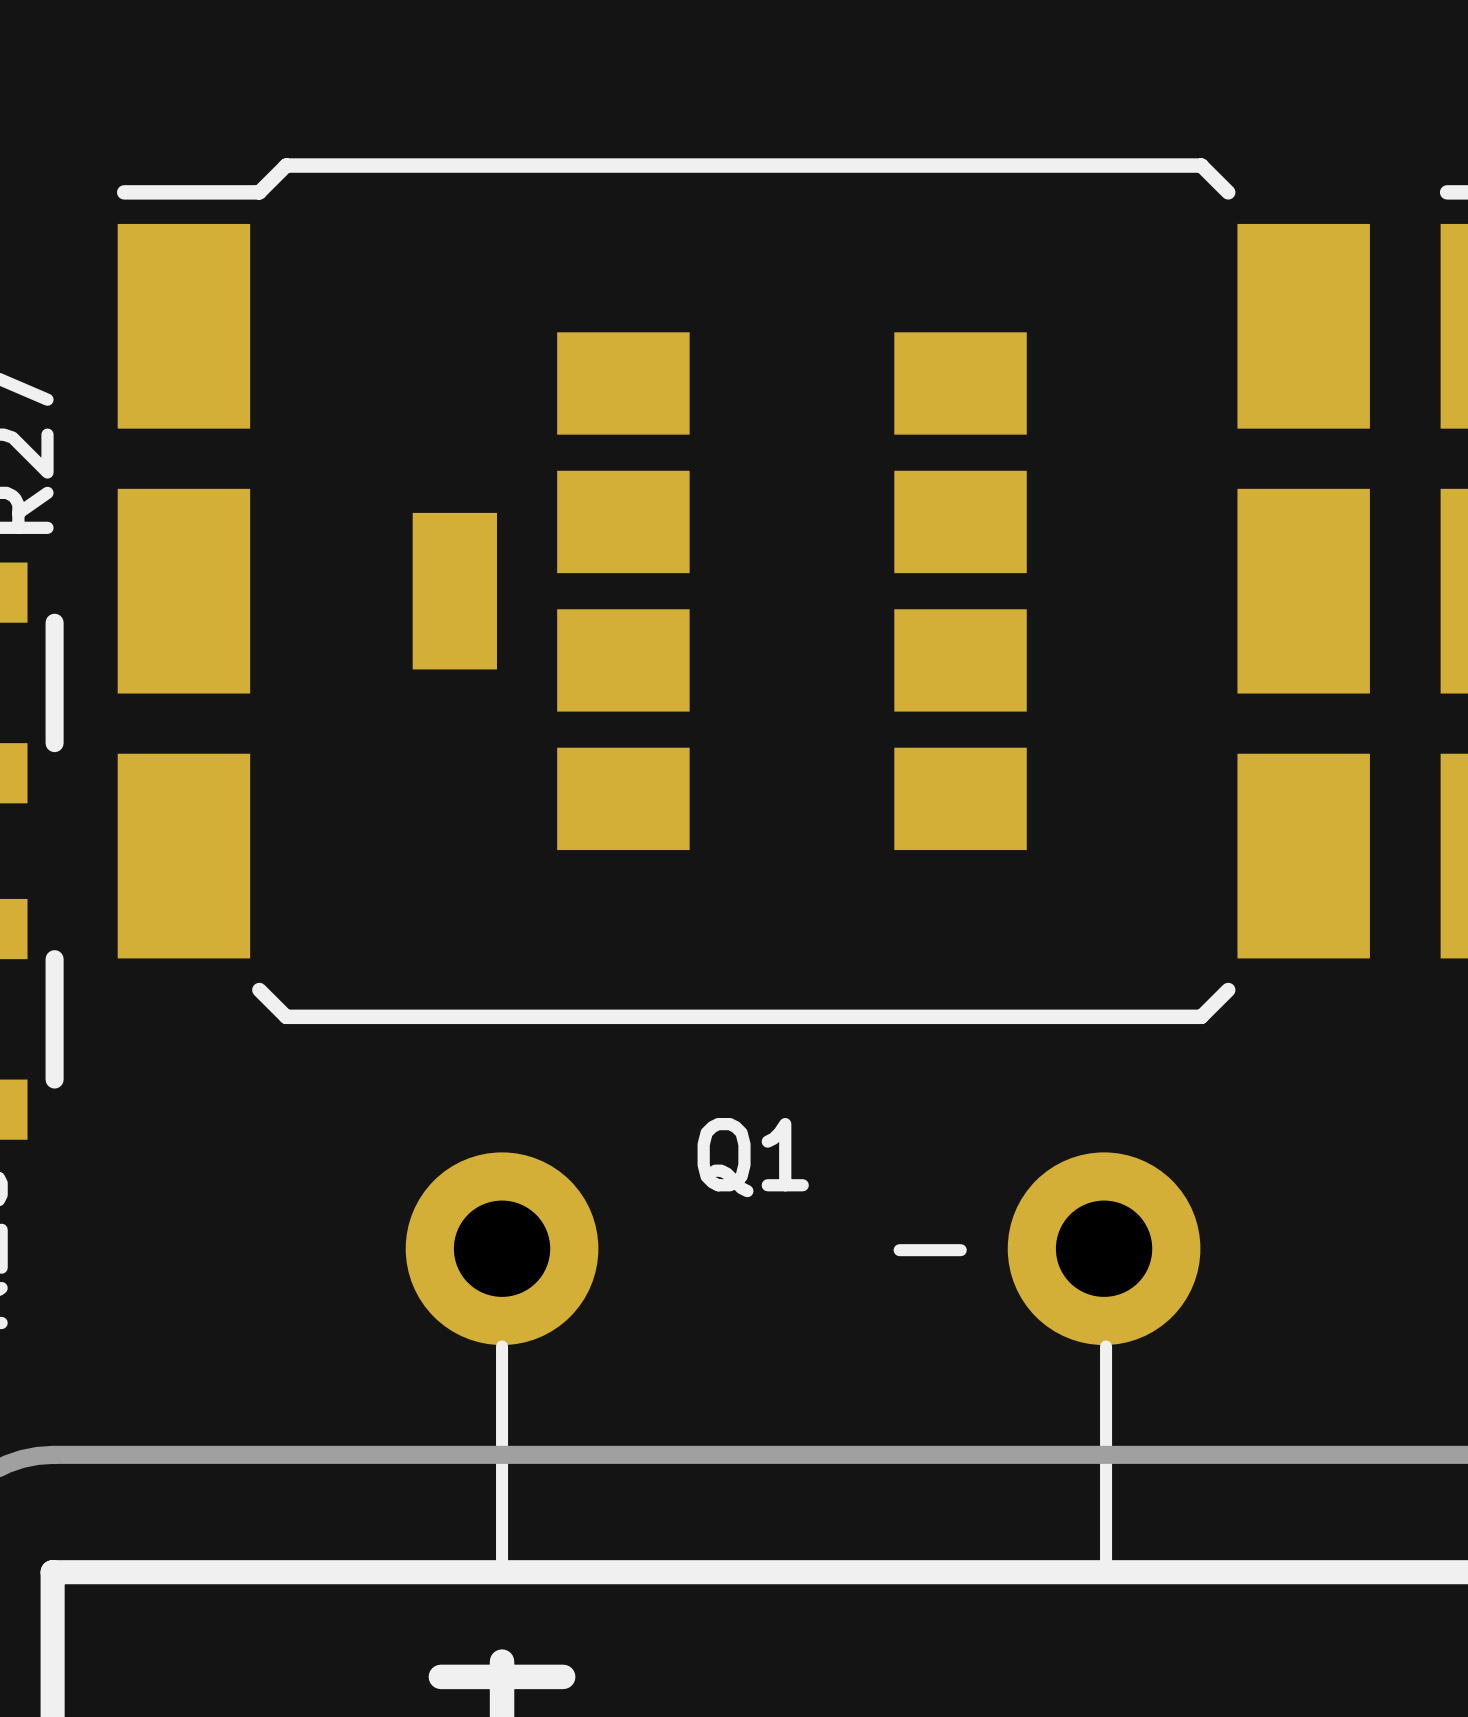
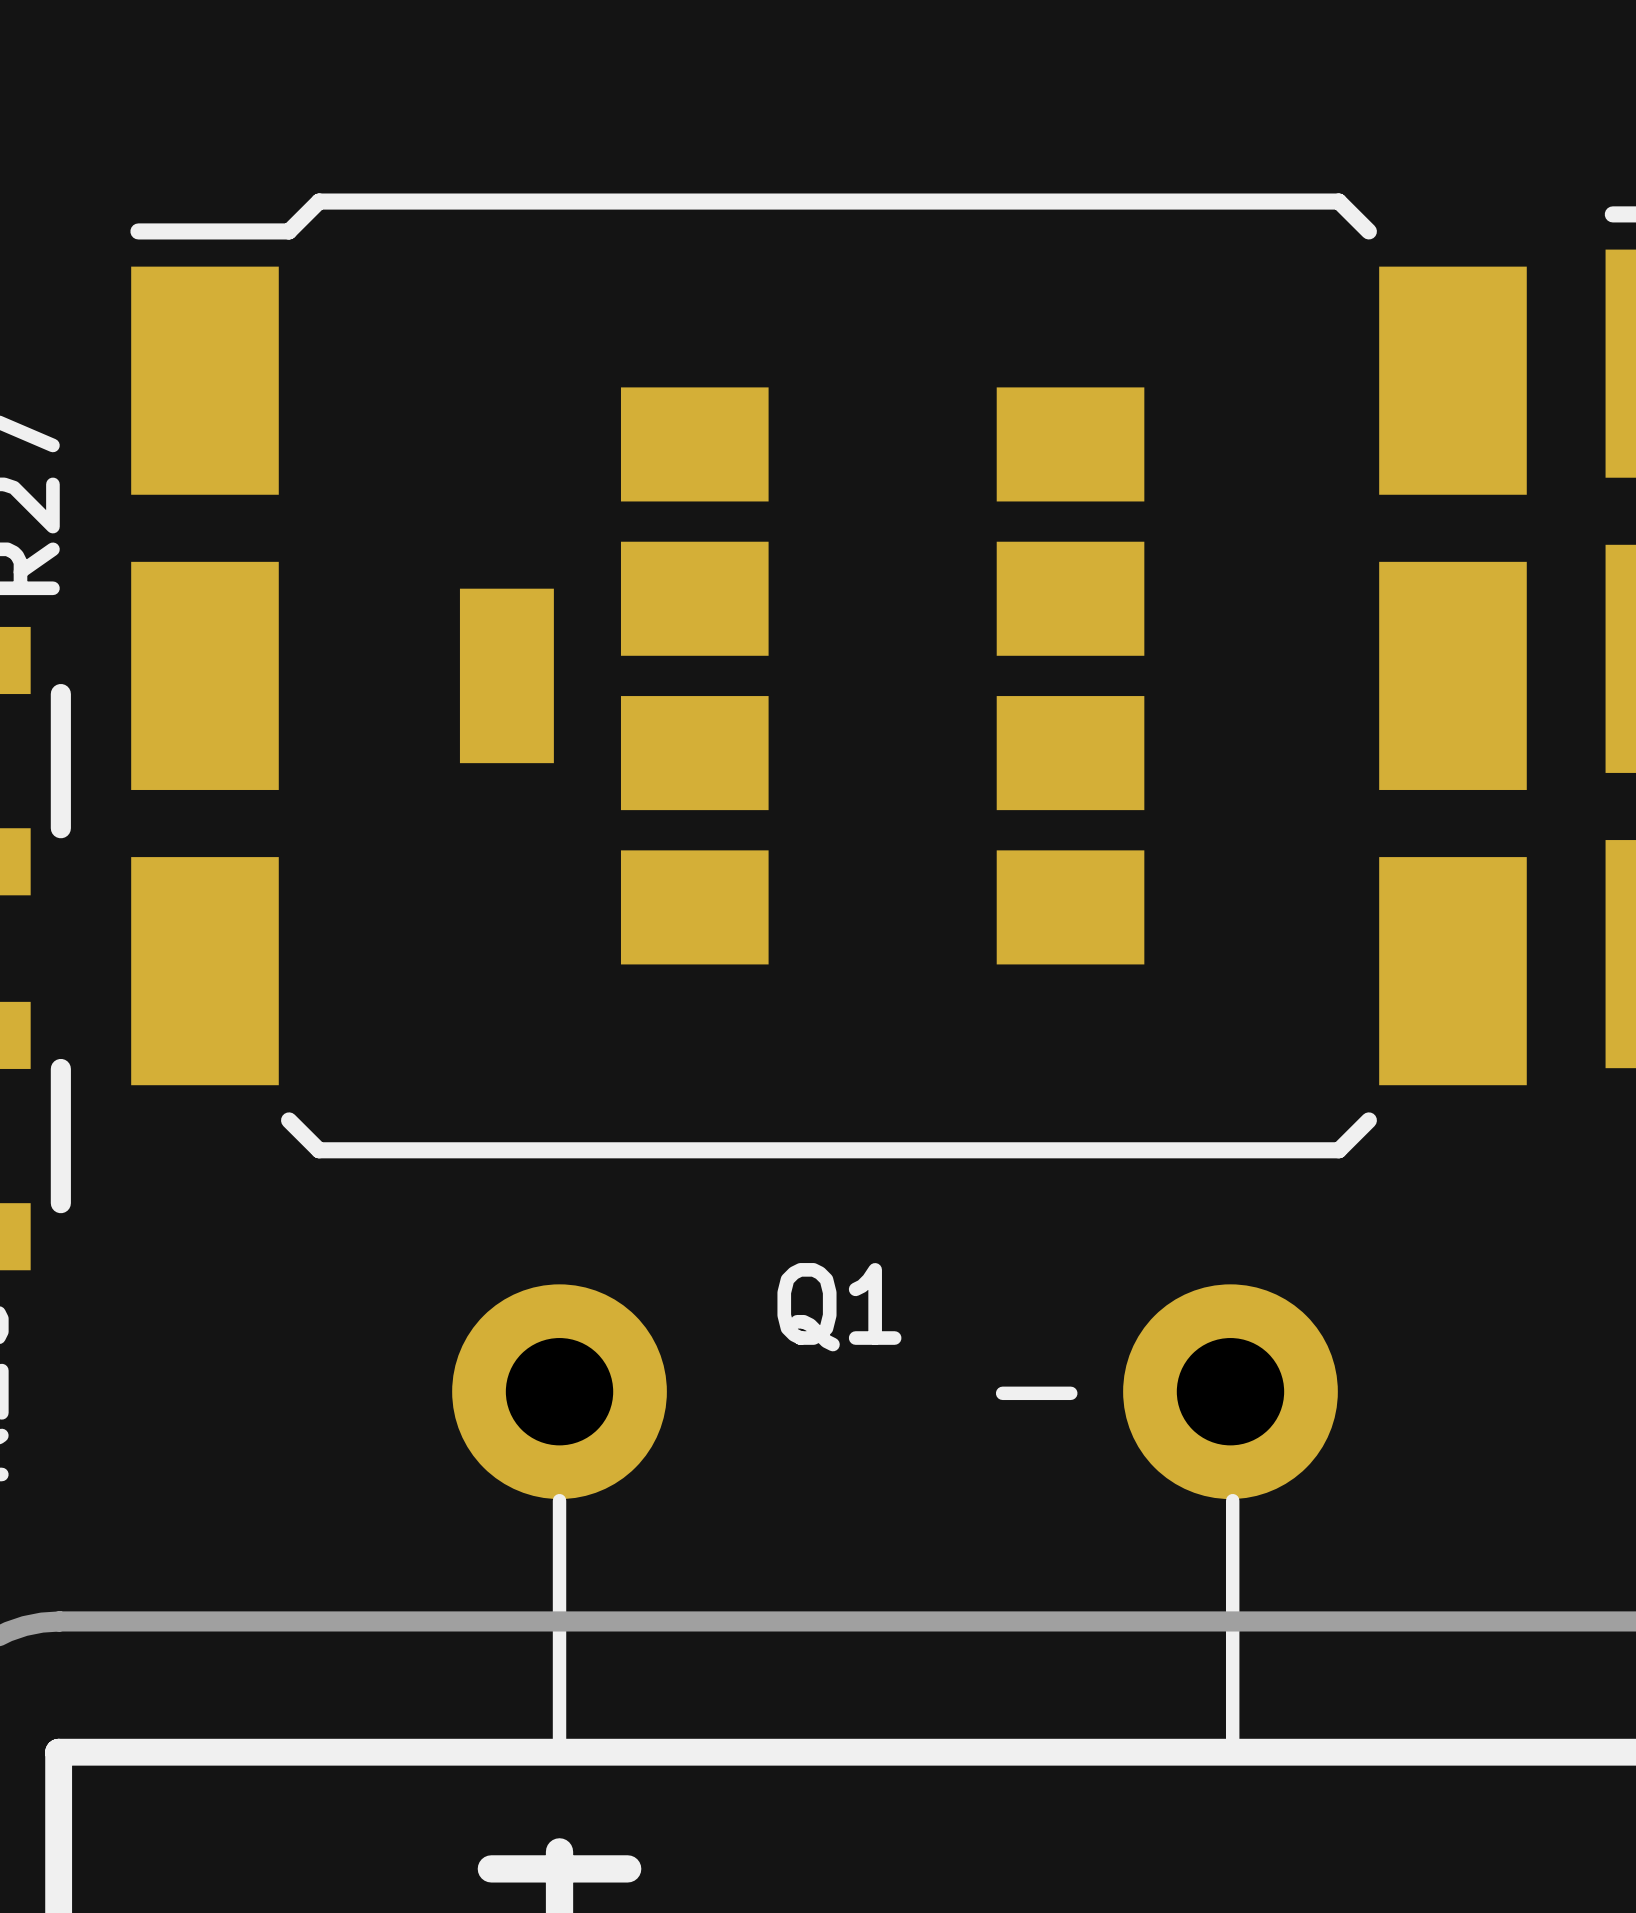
Q1 position: (743, 591) -> (828, 675)

